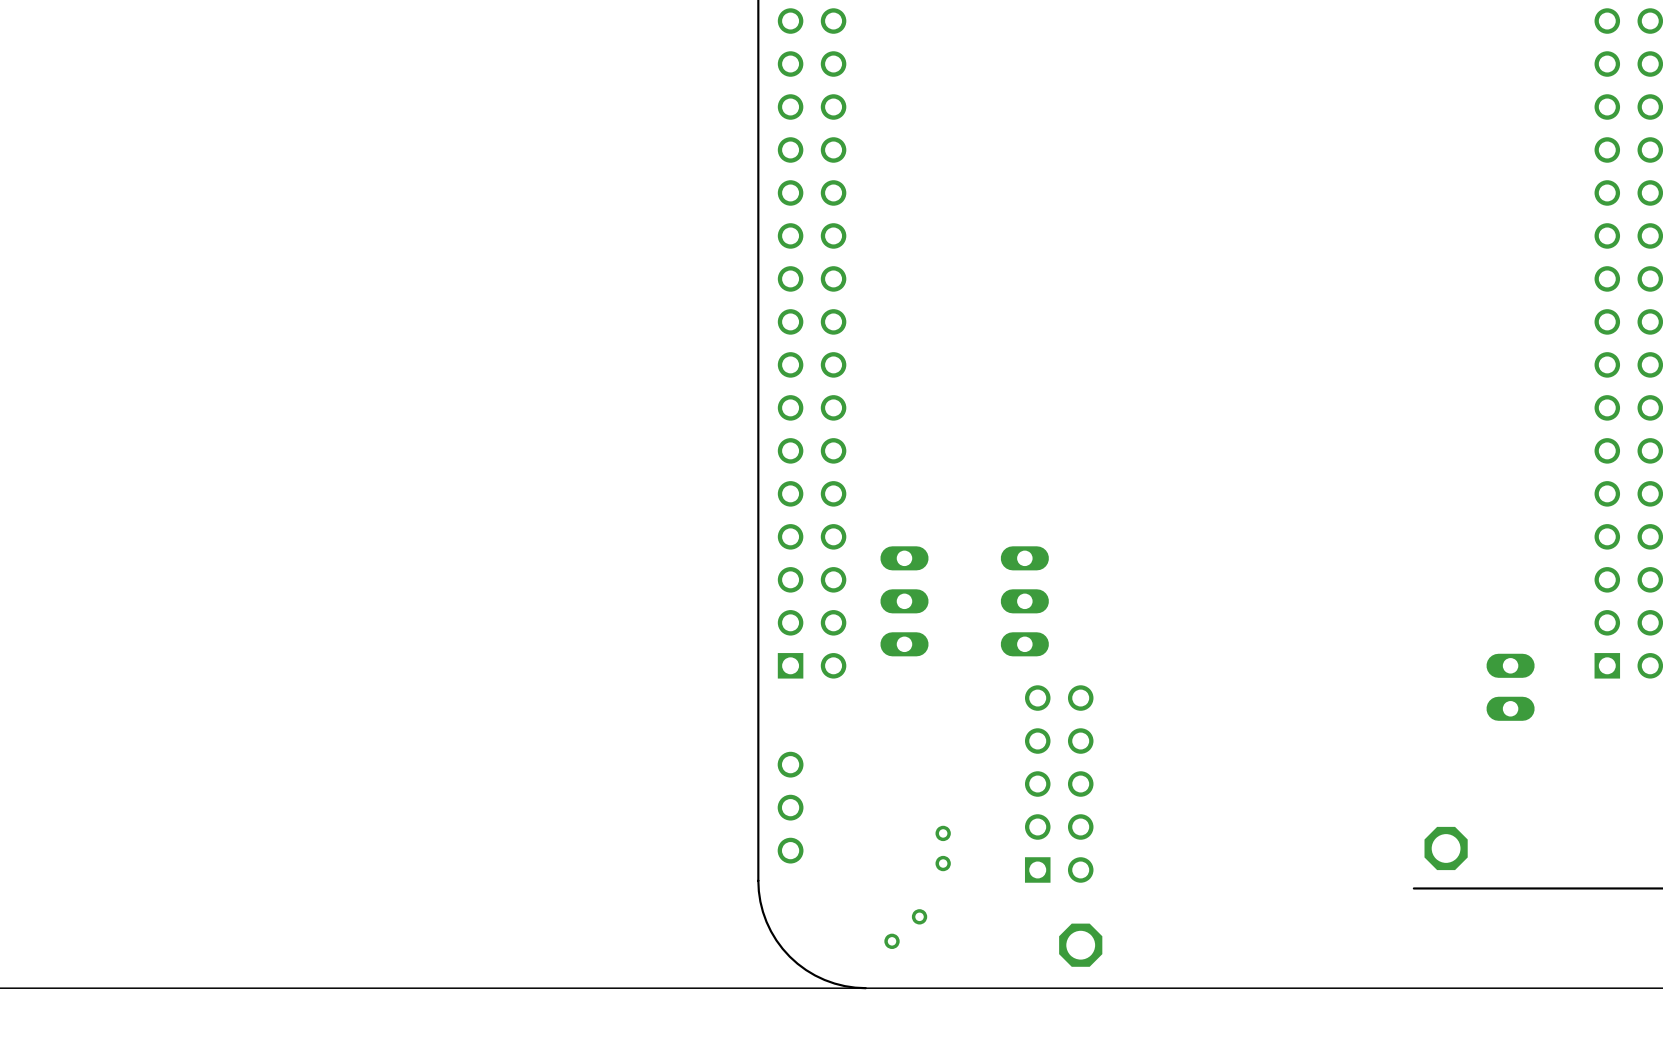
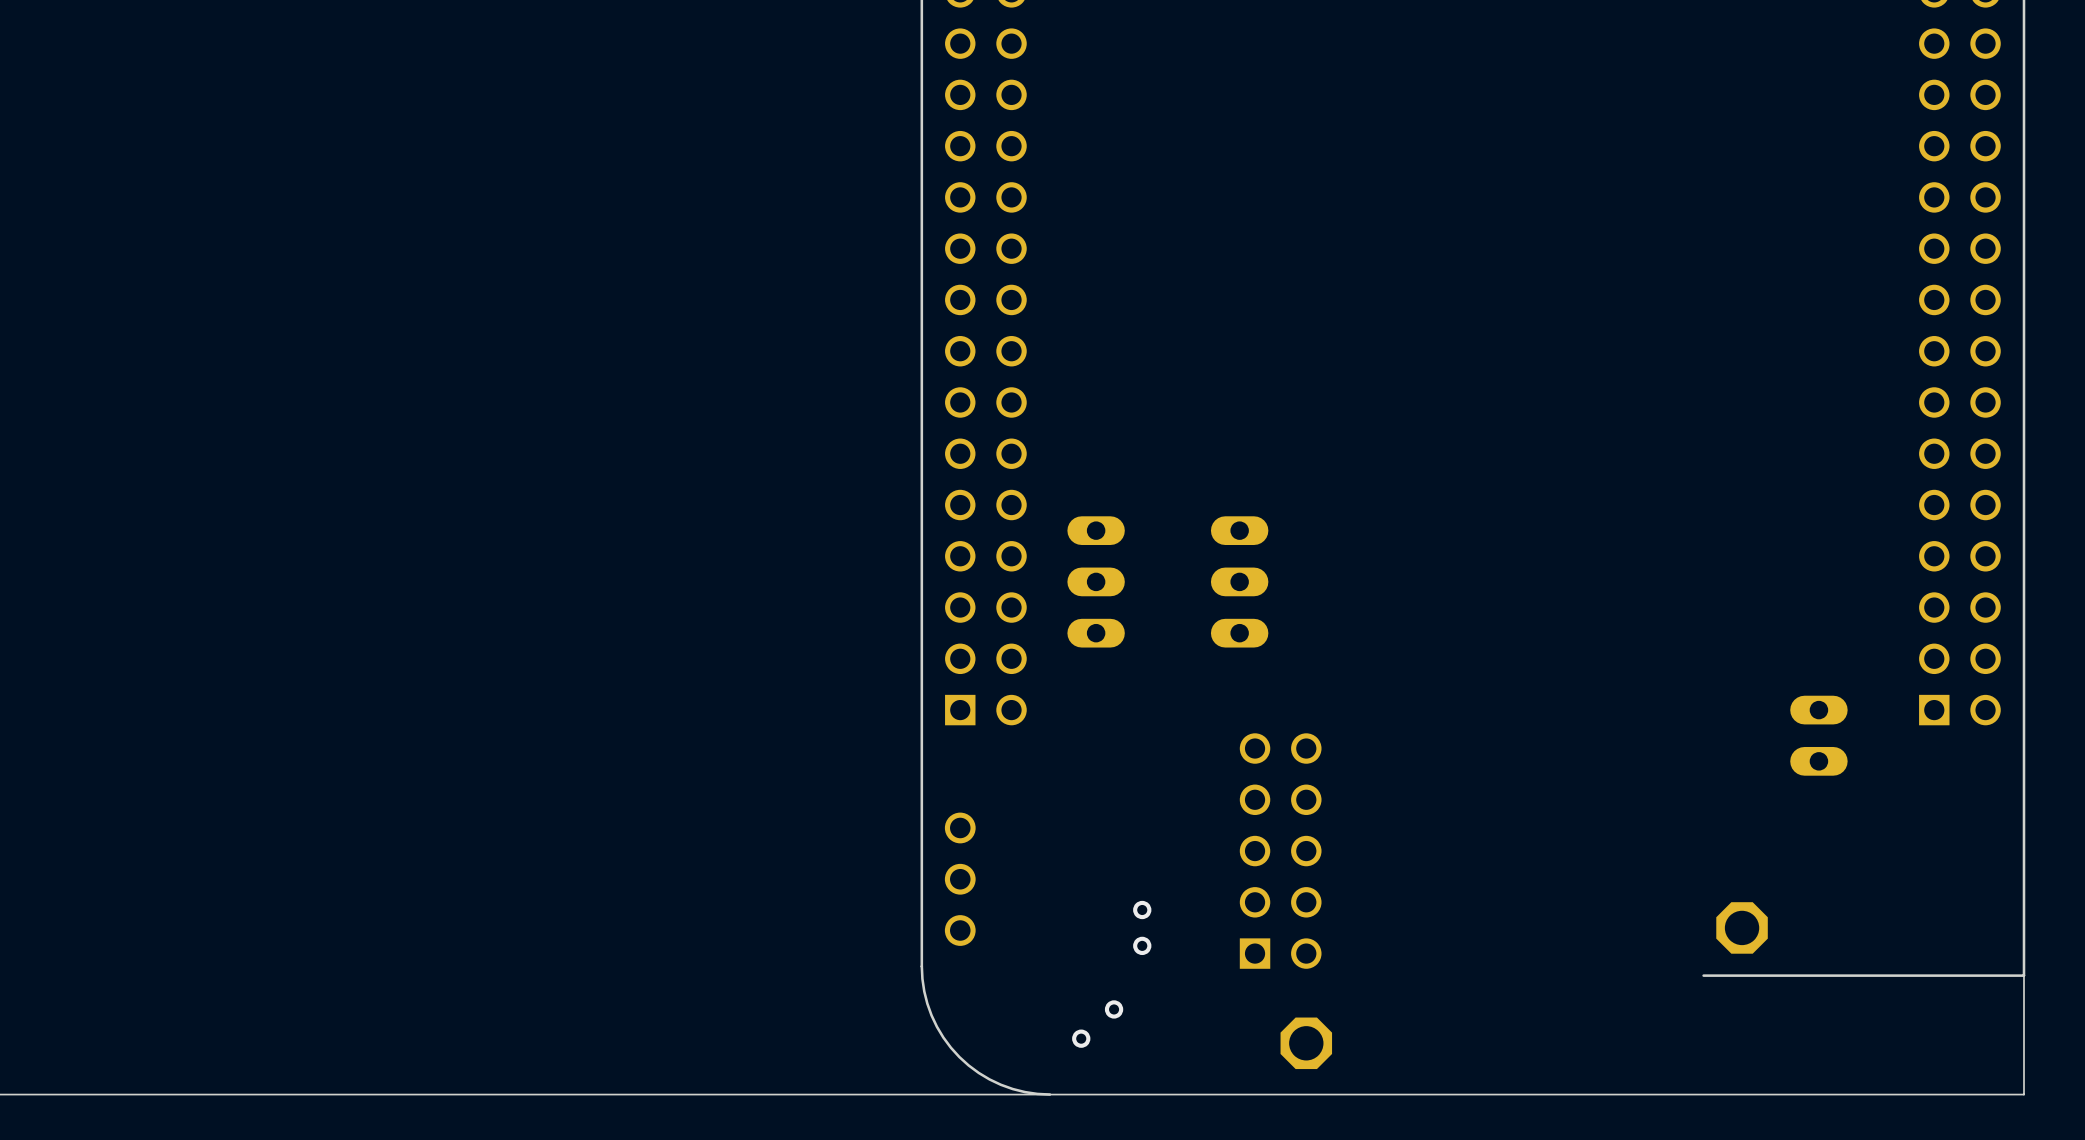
part position: (904, 601) -> (1096, 581)
part position: (1024, 601) -> (1239, 581)

